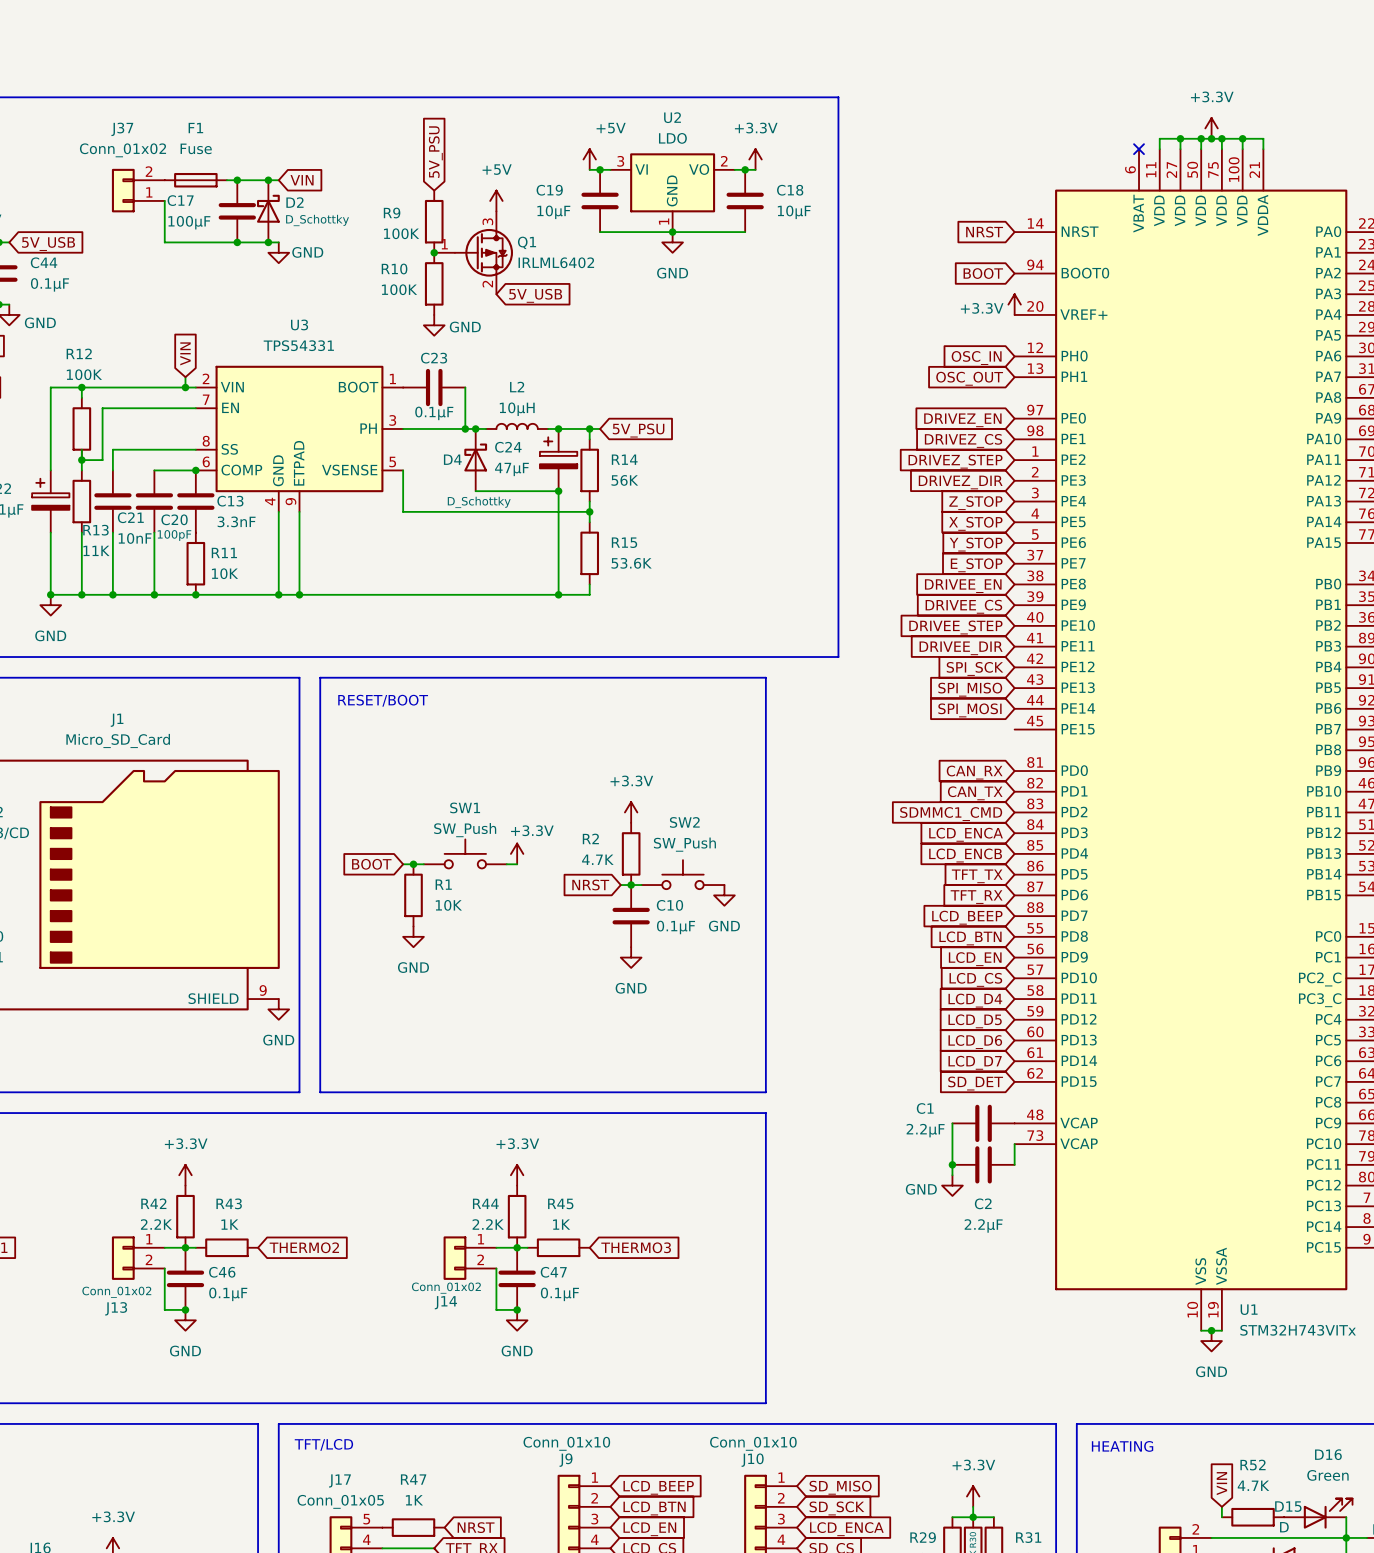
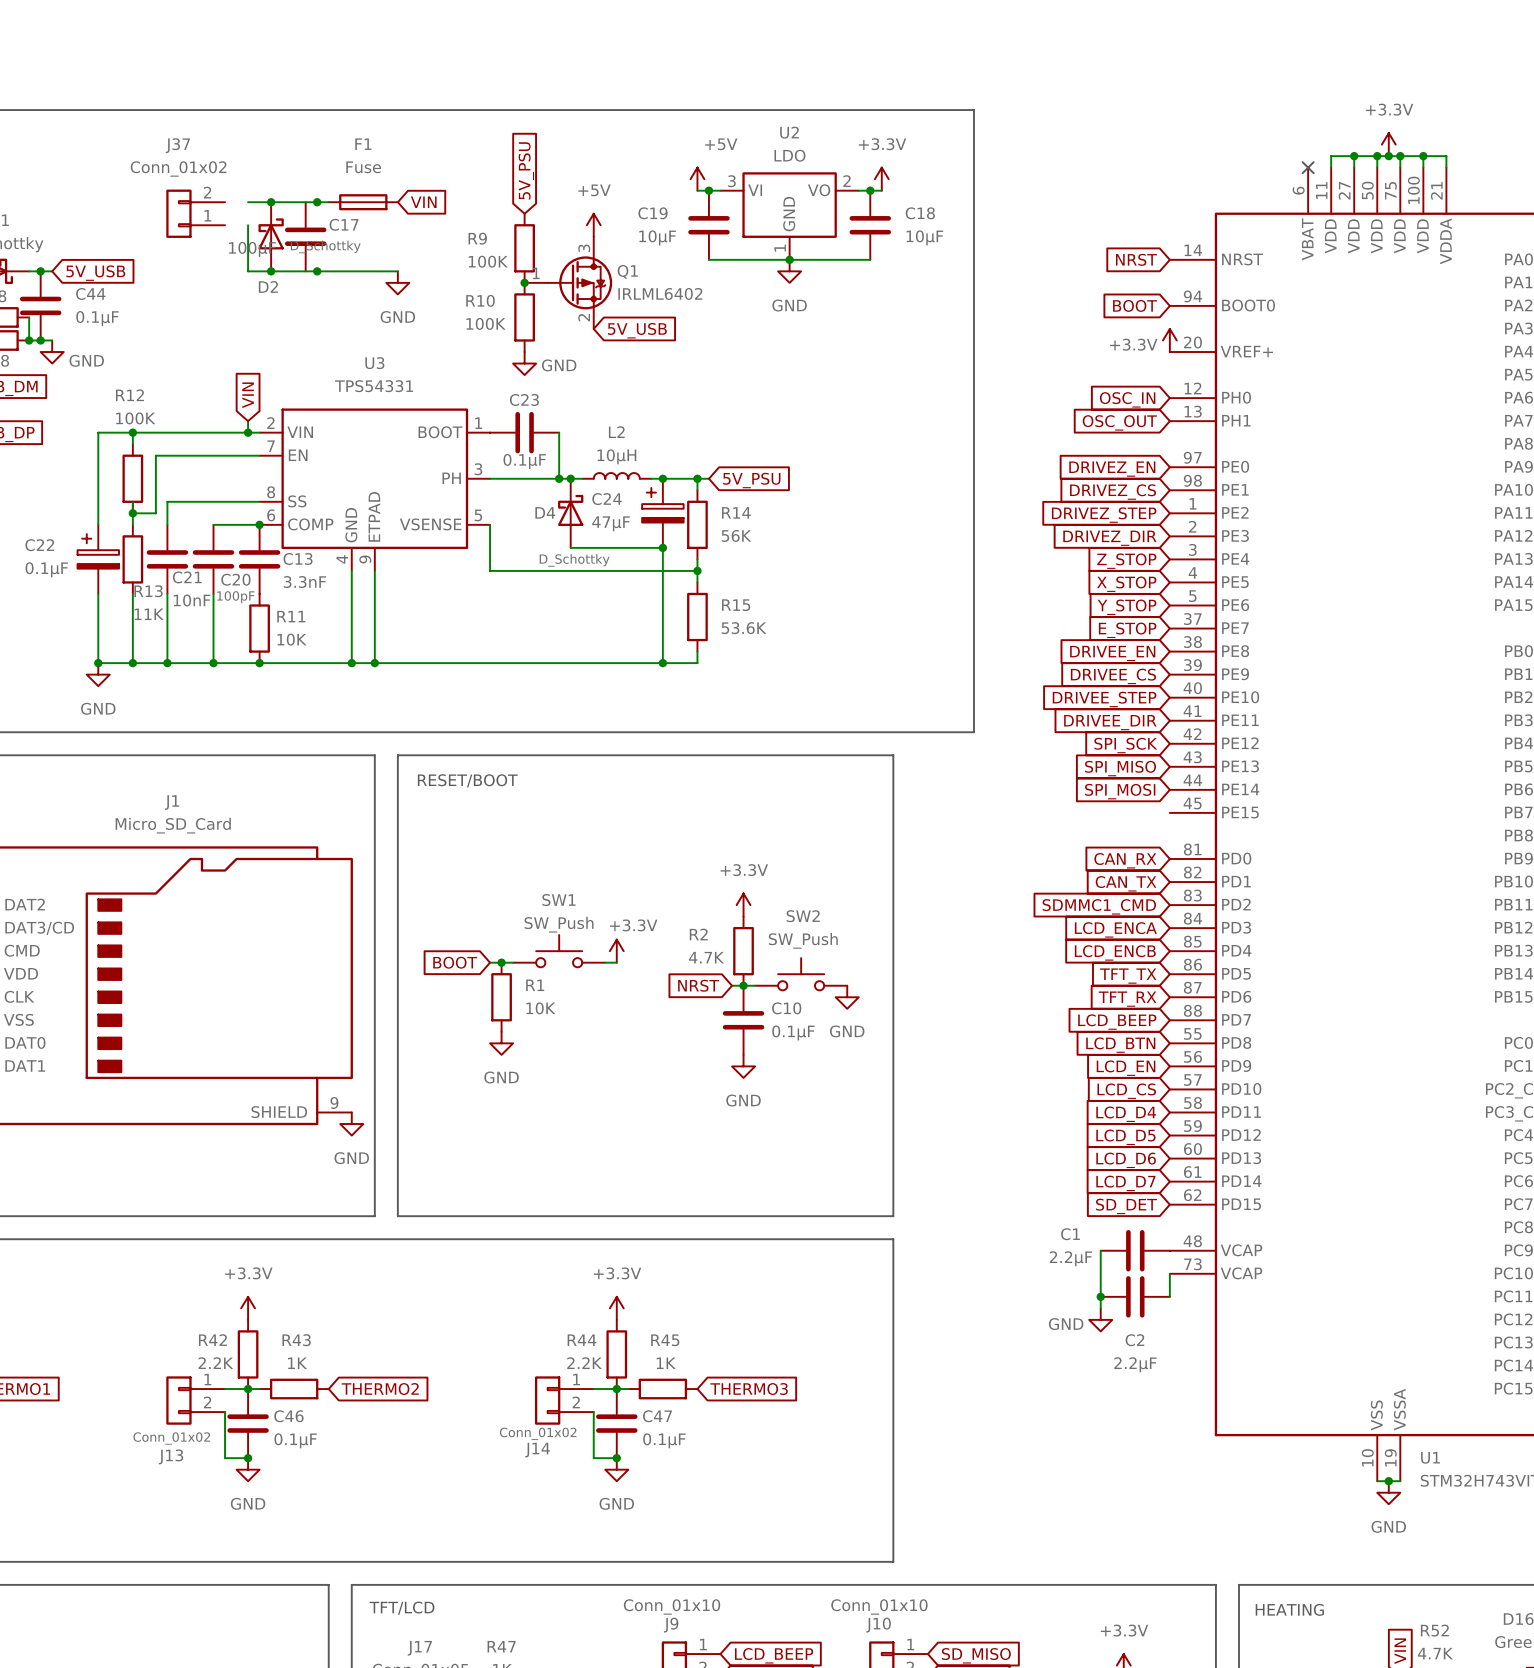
F1 position: (195, 180) -> (363, 202)
junction: none -> (271, 202)
junction: (237, 180) -> none
junction: none -> (317, 202)
junction: (268, 180) -> none
global label position: VIN (302, 180) -> VIN (423, 202)
wire: (164, 200) (164, 242) (185, 242) -> (248, 225) (248, 271)
C17 name position: C17 (180, 200) -> C17 (344, 224)
D2 name position: D2 (294, 202) -> D2 (268, 286)
D2 position: (268, 211) -> (271, 236)
junction: none -> (271, 271)
junction: (237, 242) -> none
junction: none -> (317, 271)
junction: (268, 242) -> none
wire: none -> (351, 271) (397, 271)
power symbol position: GND (278, 252) -> GND (397, 282)
power symbol text position: GND (307, 252) -> GND (397, 317)

